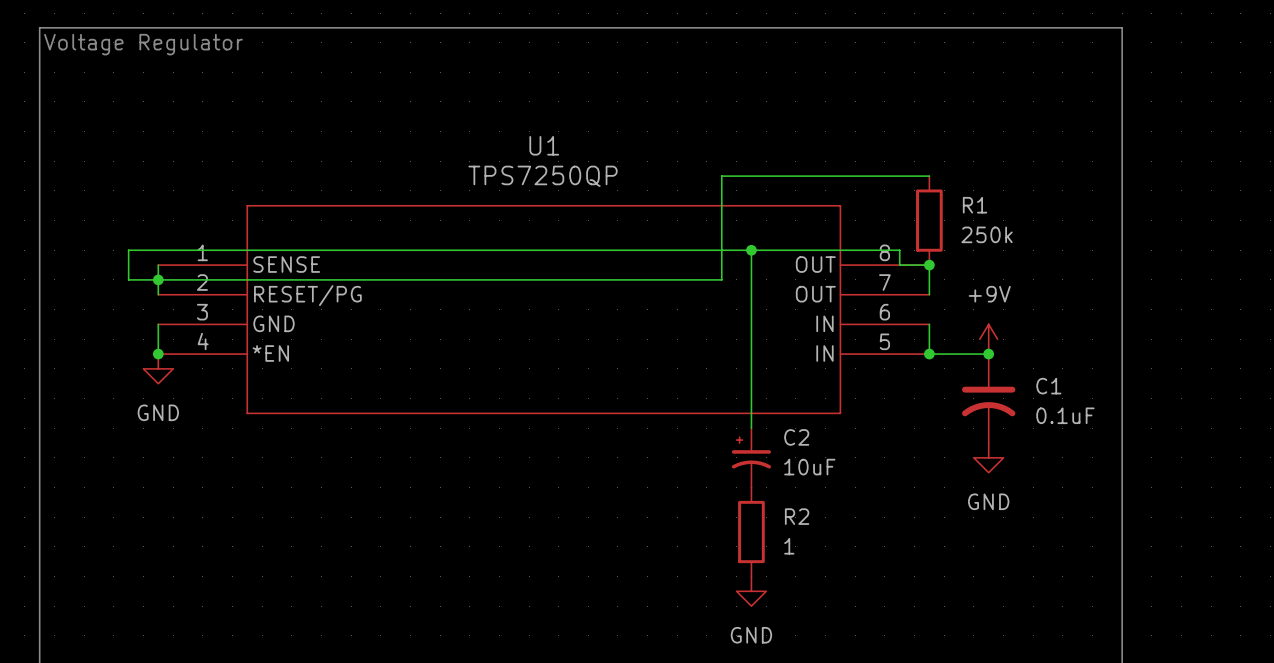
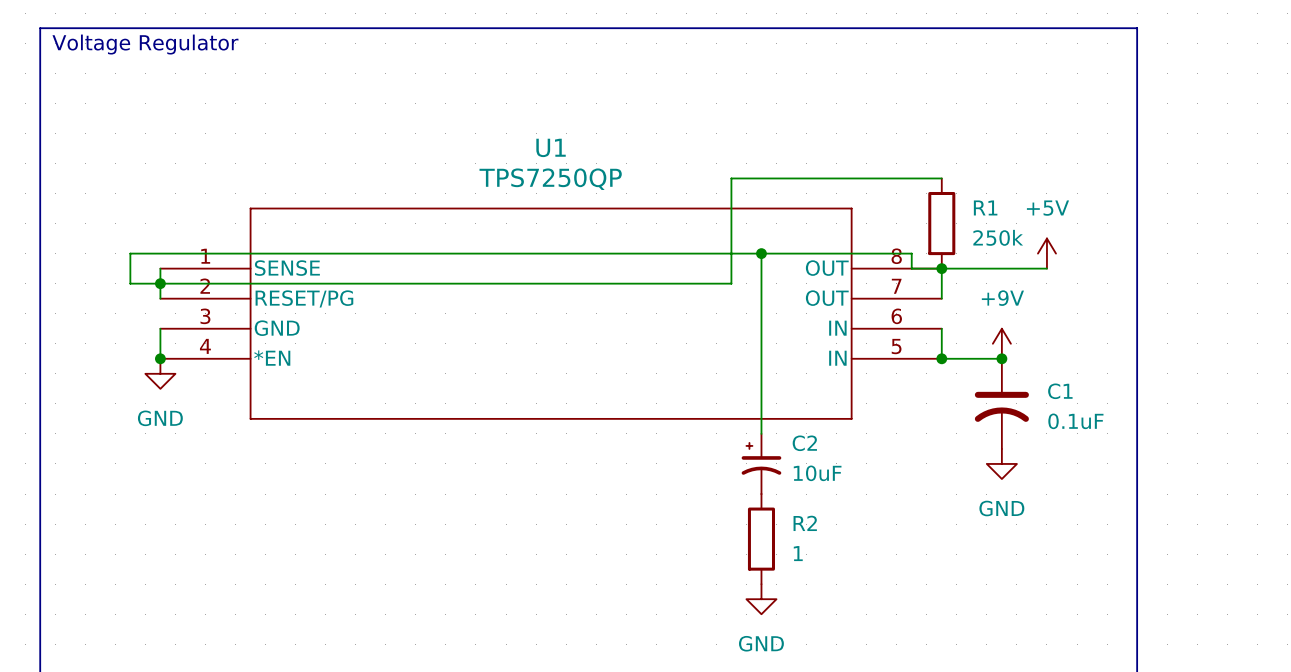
power symbol: none -> +5V (1046, 253)
wire: none -> (941, 268) (1046, 268)

